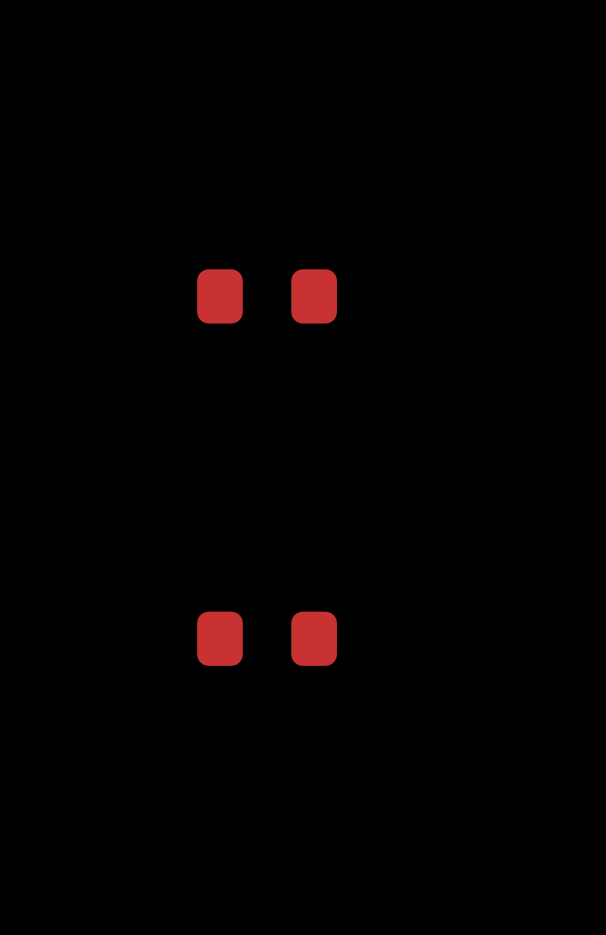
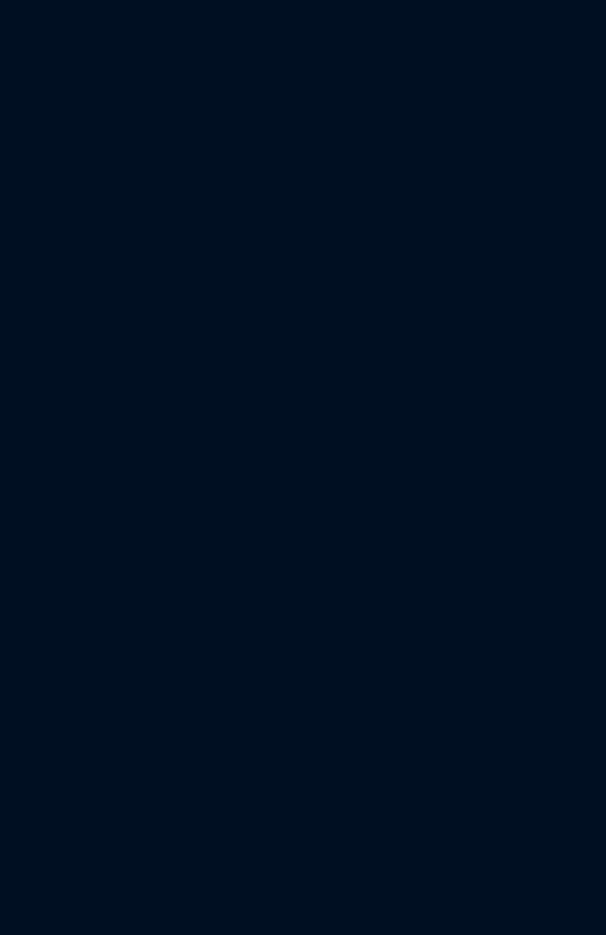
part: (267, 296) -> none
part: (267, 638) -> none

